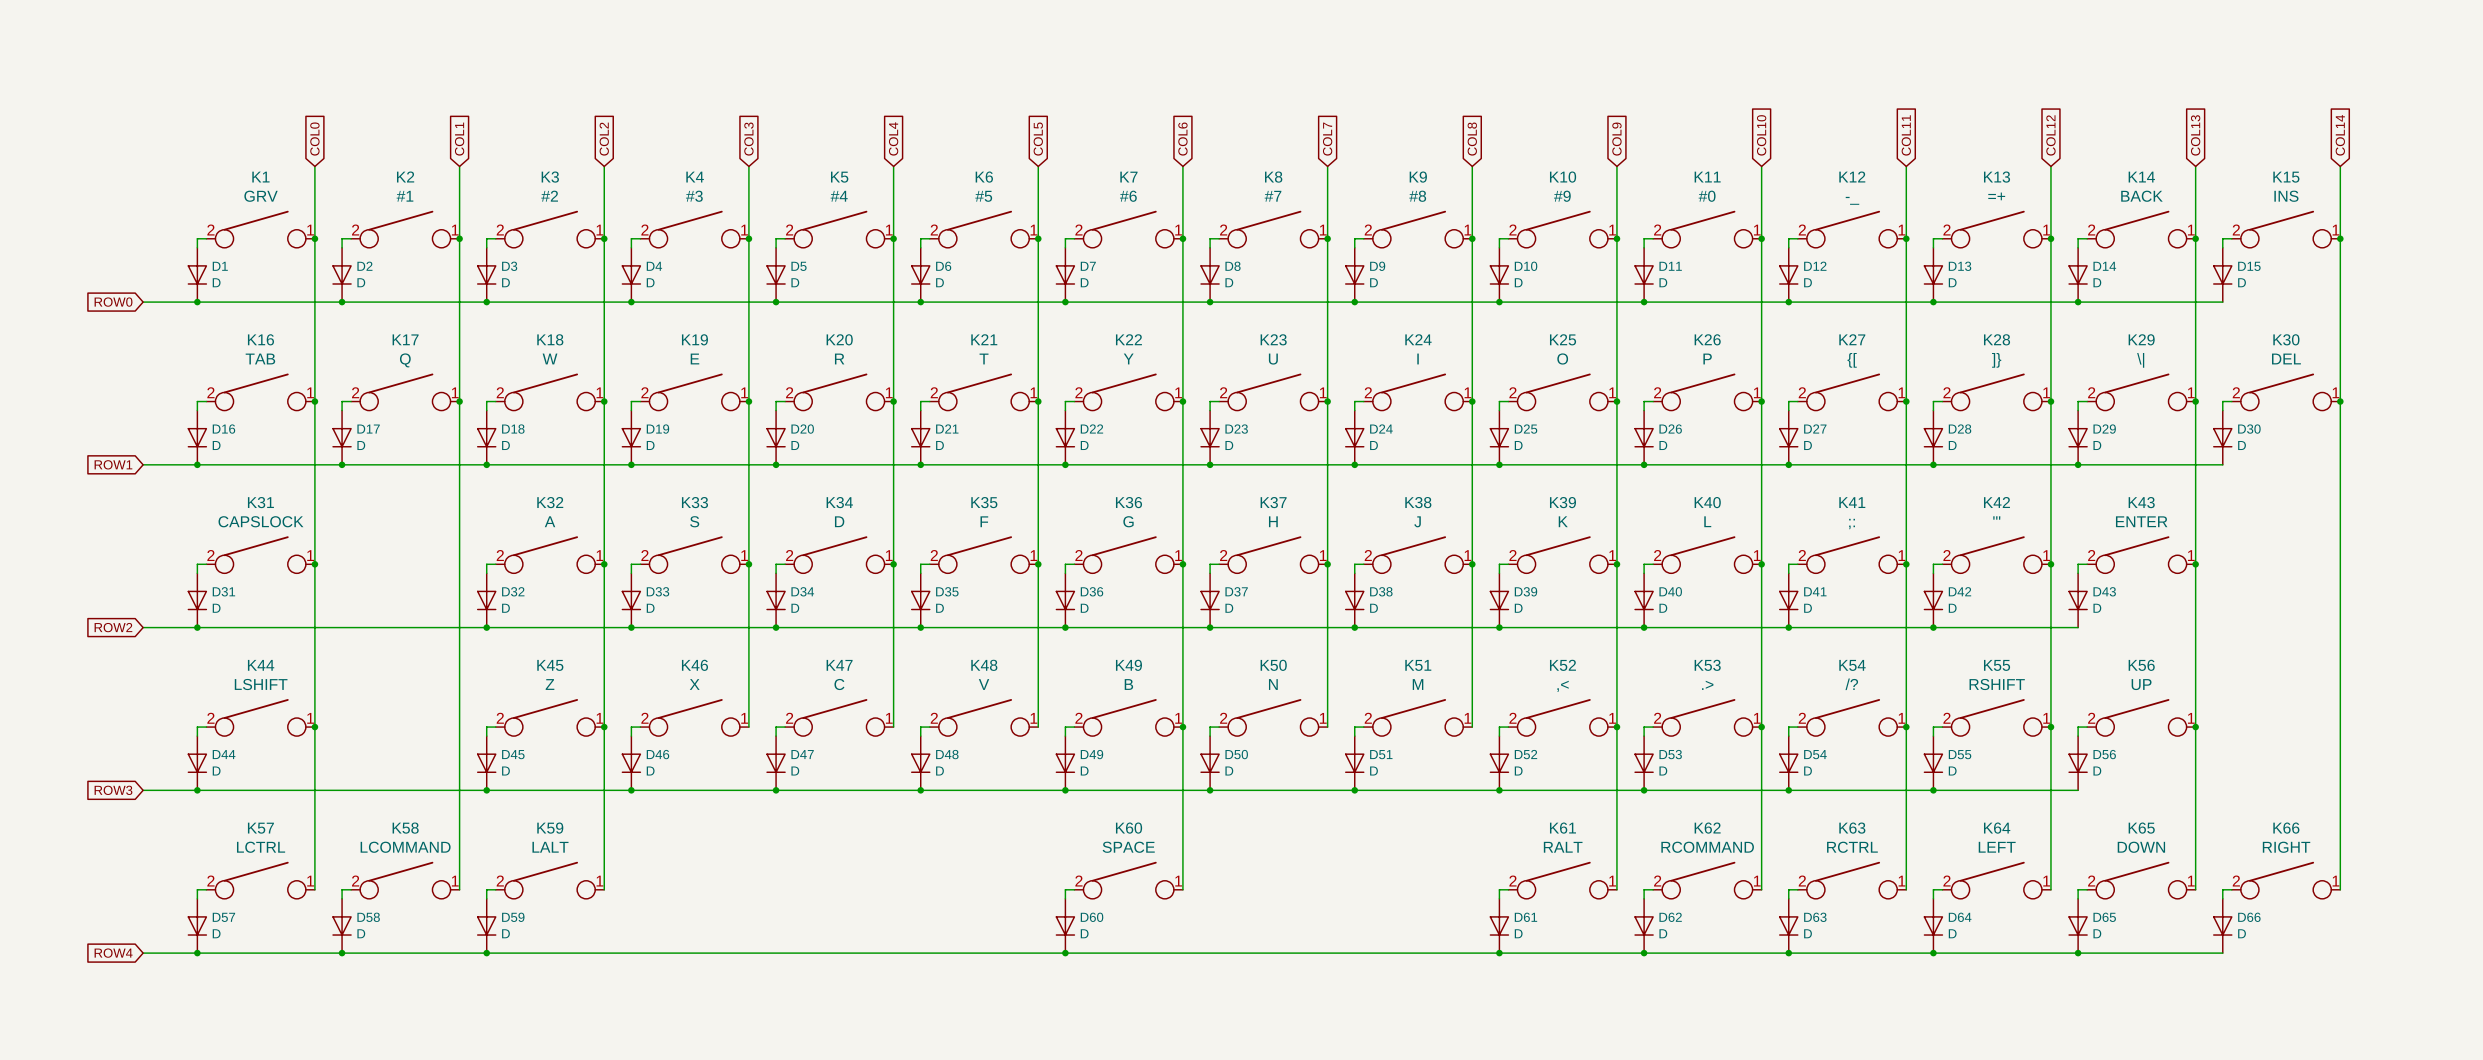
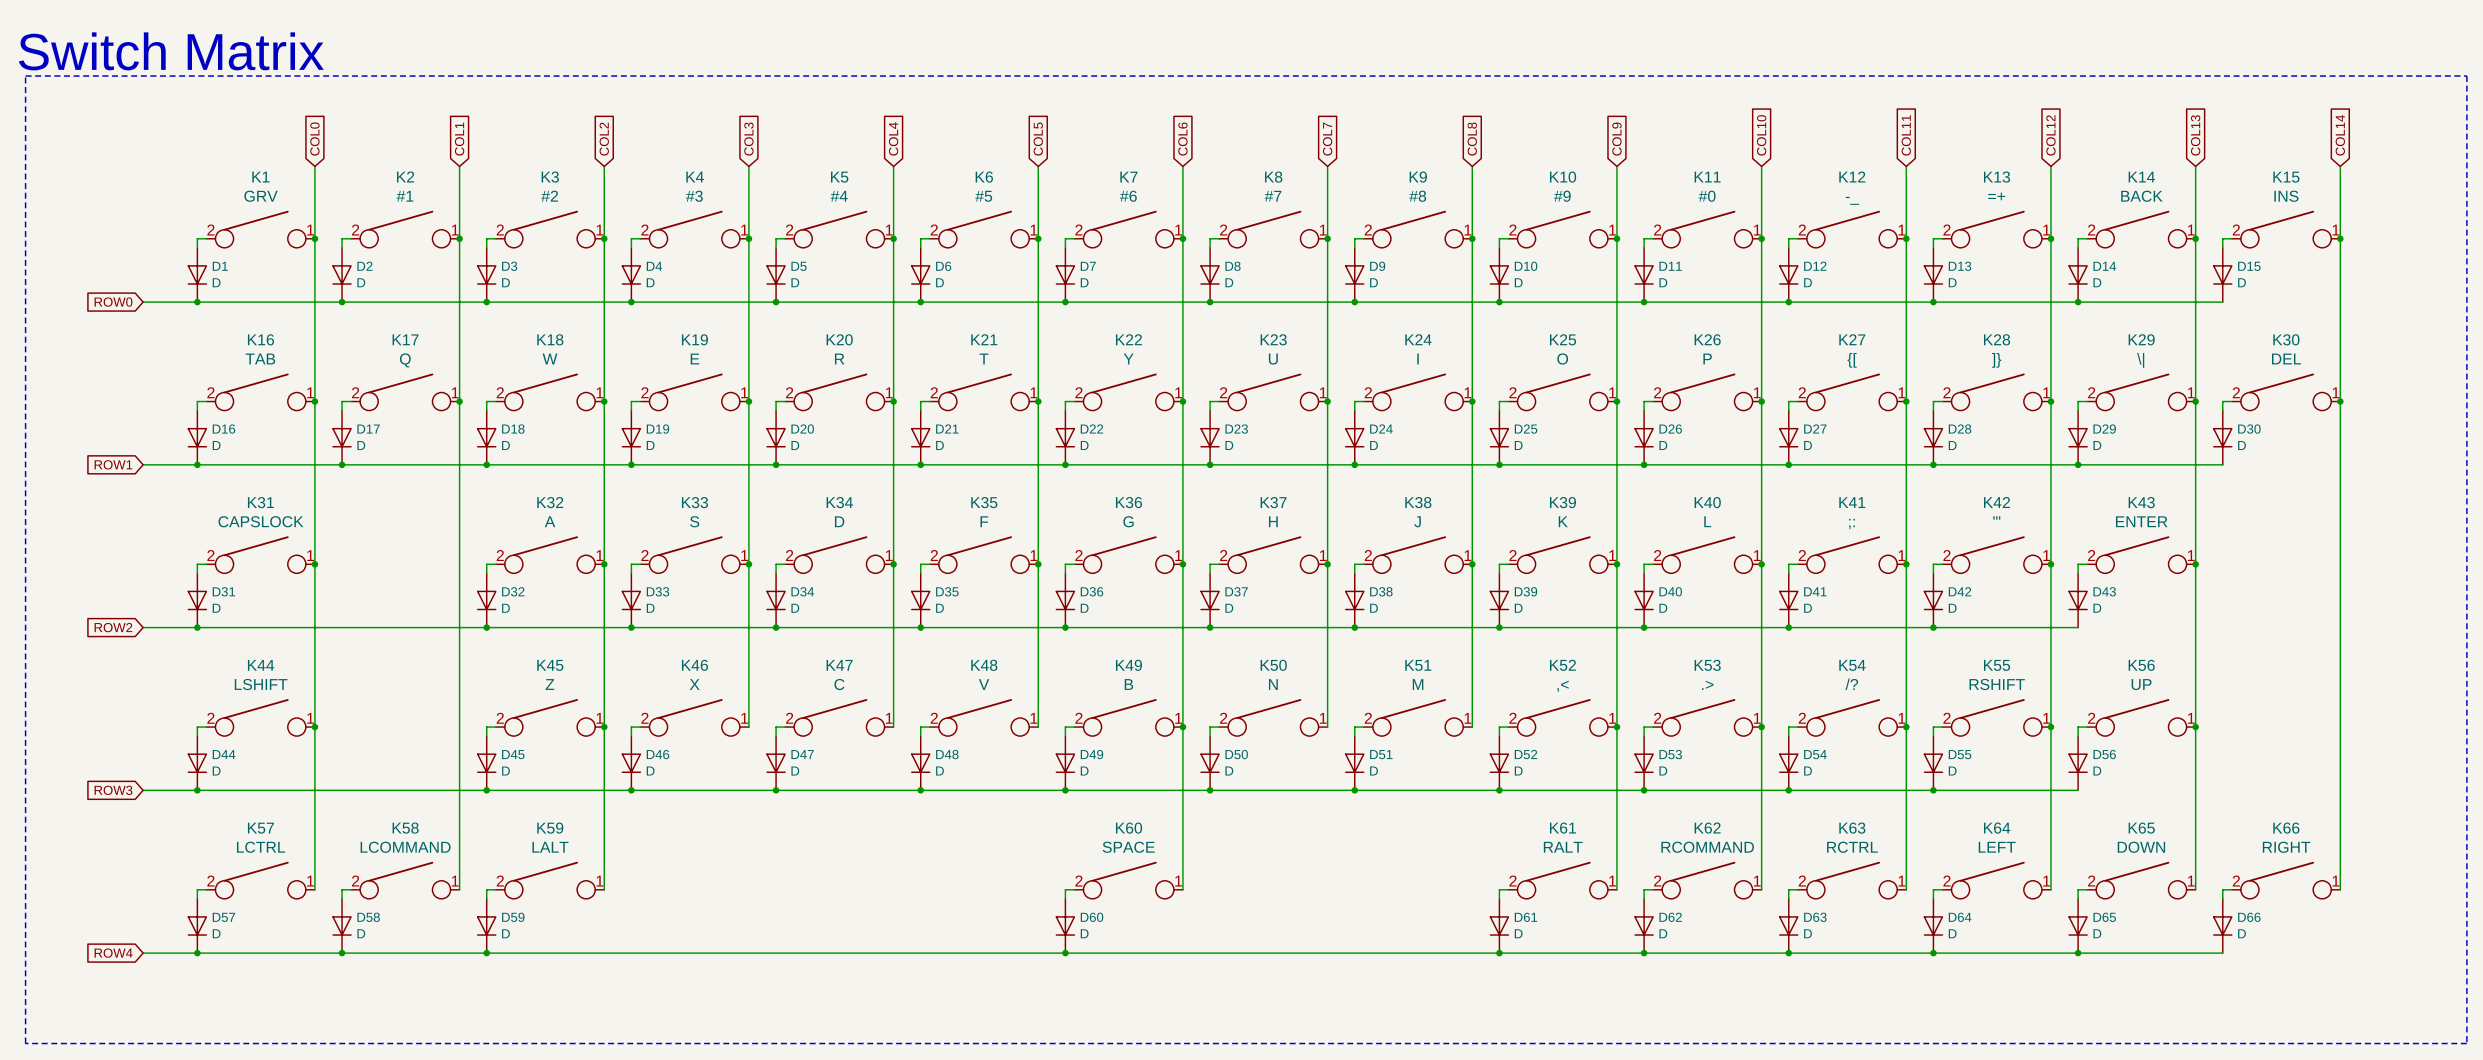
text: none -> Switch Matrix (171, 51)
line: none -> (25, 76) (2466, 76) (2466, 1043) (25, 1043) (25, 76)

